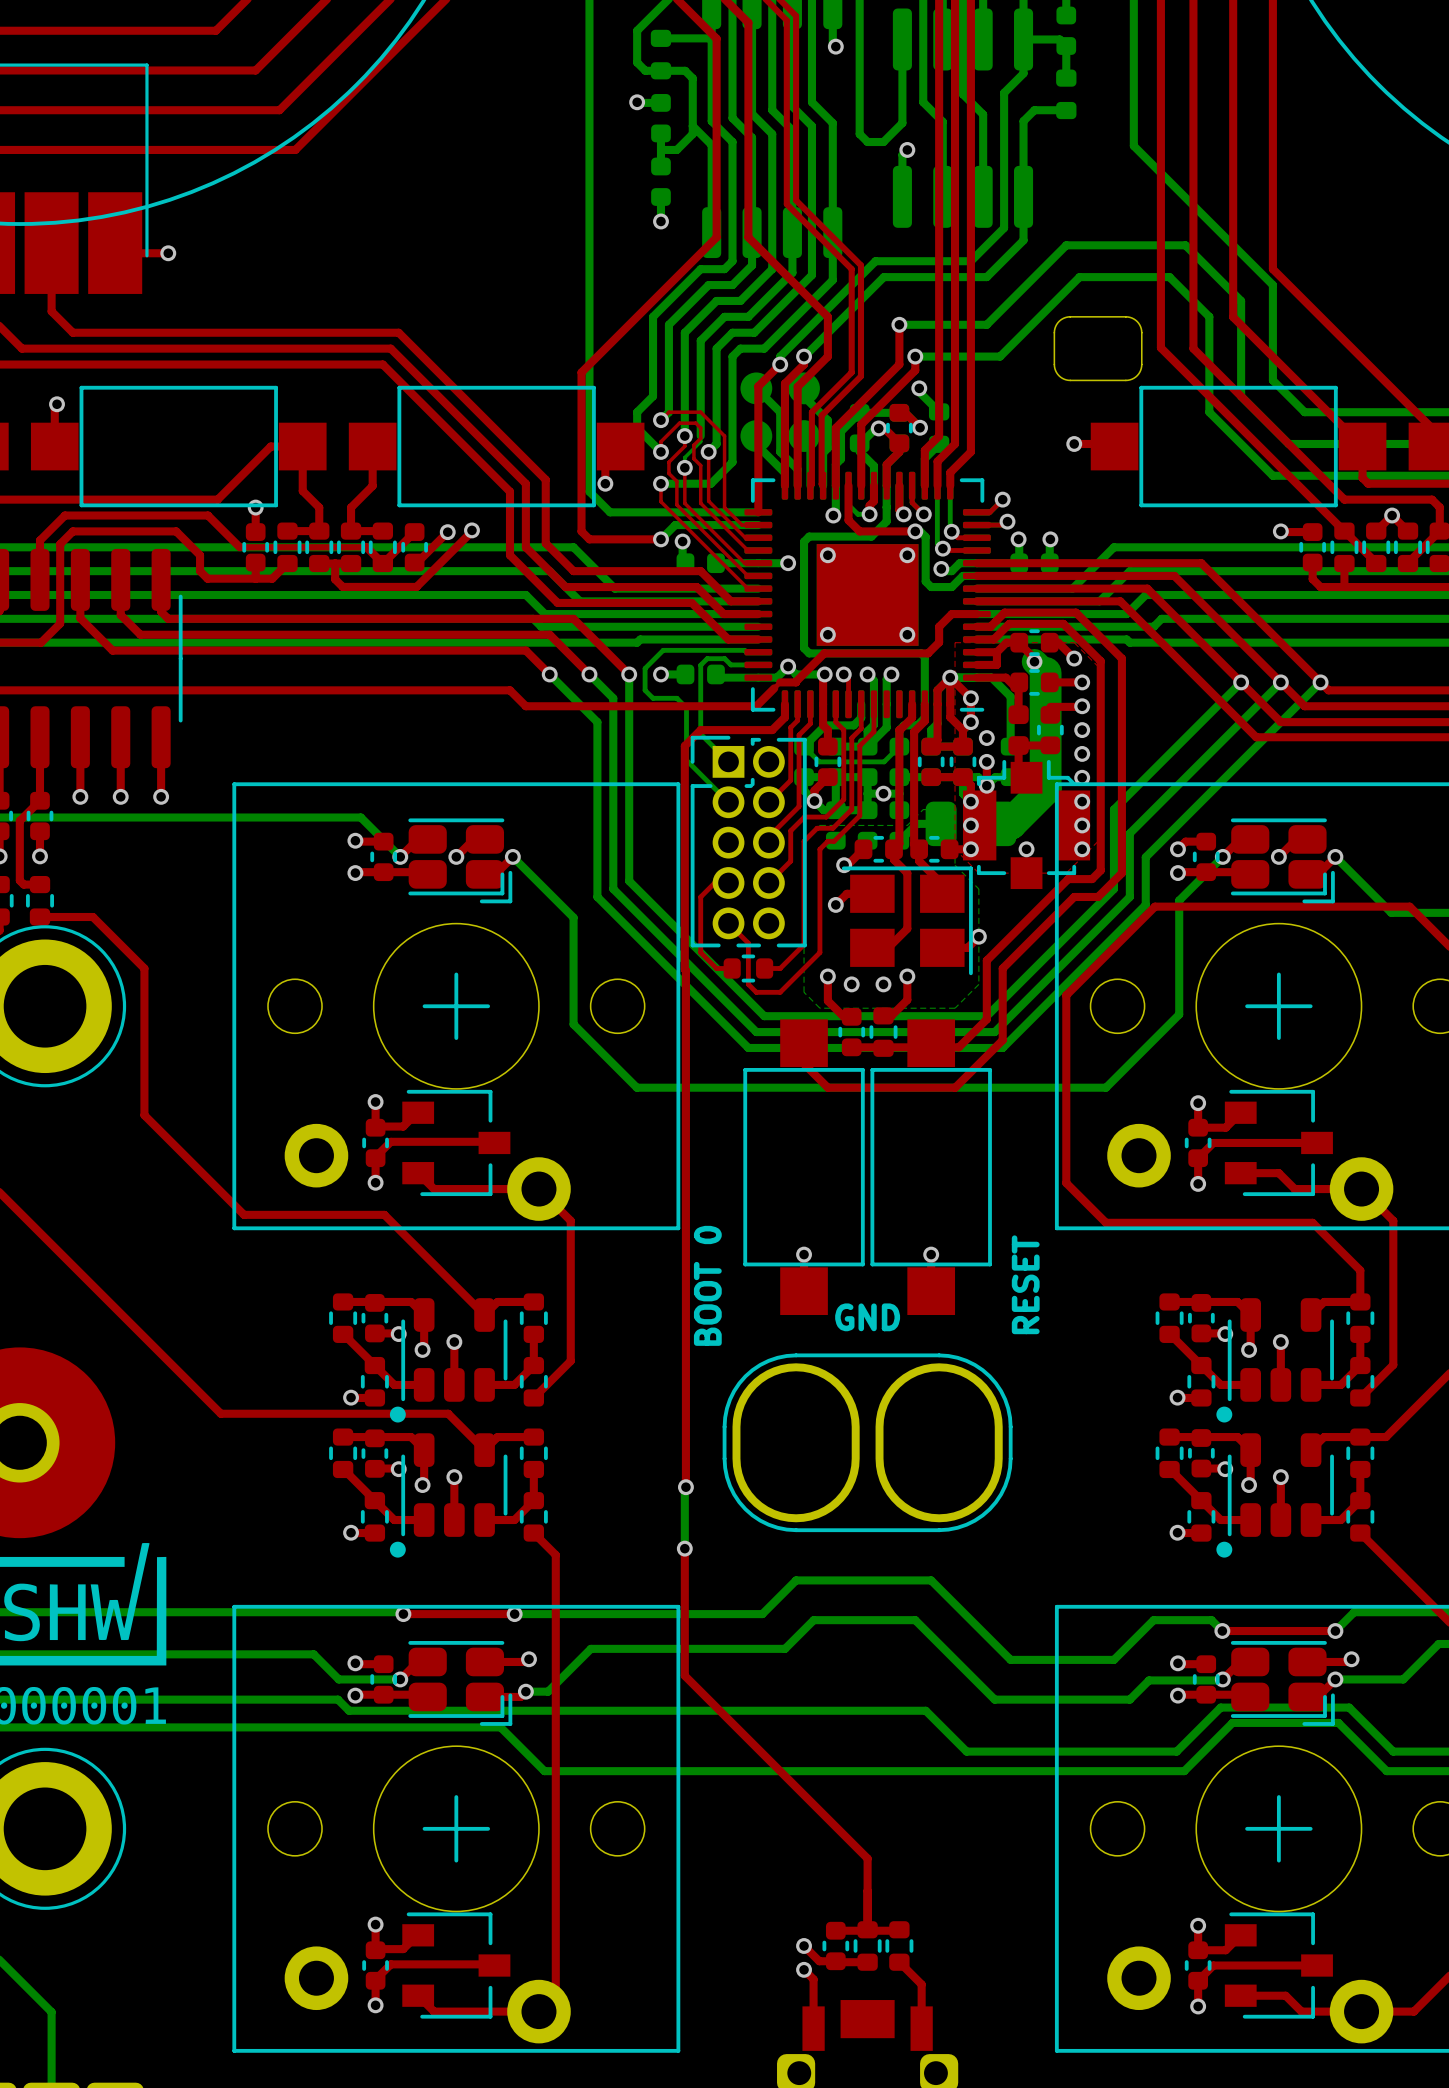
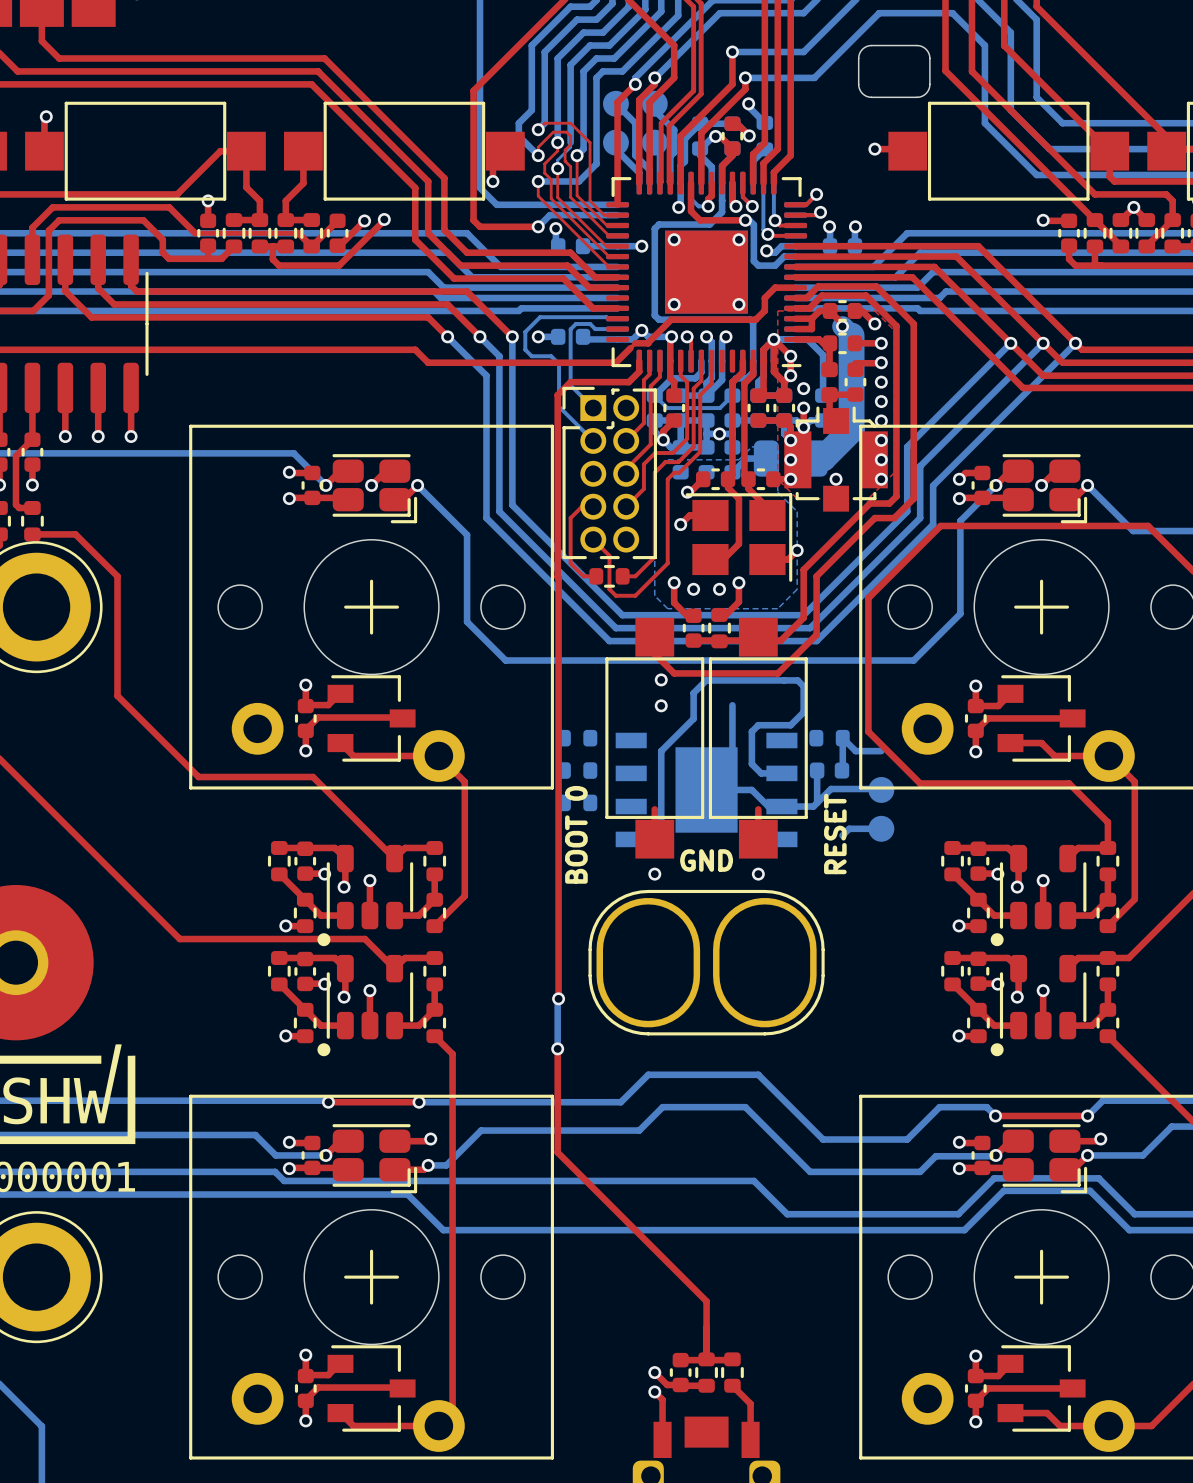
bottom track: (621, 1071) (636, 1087) (1106, 1087) (1121, 1071) -> (505, 660) (913, 660)
via: none -> (661, 679)
bottom track: none -> (732, 705) (732, 764) (706, 789) (751, 789) (768, 806) (813, 806) (831, 789) (881, 789)
via: none -> (661, 705)
top track: (1066, 1159) (1066, 1183) (1106, 1222) (1129, 1222) -> (868, 731) (920, 783)
part: none -> (577, 738)
part: none -> (829, 738)
bottom track: none -> (881, 751) (855, 751) (842, 738) (841, 770)
part: none -> (577, 770)
bottom track: none -> (817, 770) (817, 802)
part: none -> (829, 770)
bottom track: none -> (781, 773) (761, 773) (751, 764) (751, 731) (758, 725) (790, 725) (803, 712) (803, 686) (797, 680) (706, 679) (693, 693) (693, 718) (661, 751) (661, 828) (650, 839) (631, 839)
part: none -> (706, 789)
part: none -> (881, 789)
part: none -> (577, 802)
via: (804, 1254) -> none
via: (931, 1254) -> none
bottom track: none -> (881, 828) (849, 828) (842, 835)
part: none -> (881, 828)
via: none -> (654, 874)
via: none -> (758, 874)

